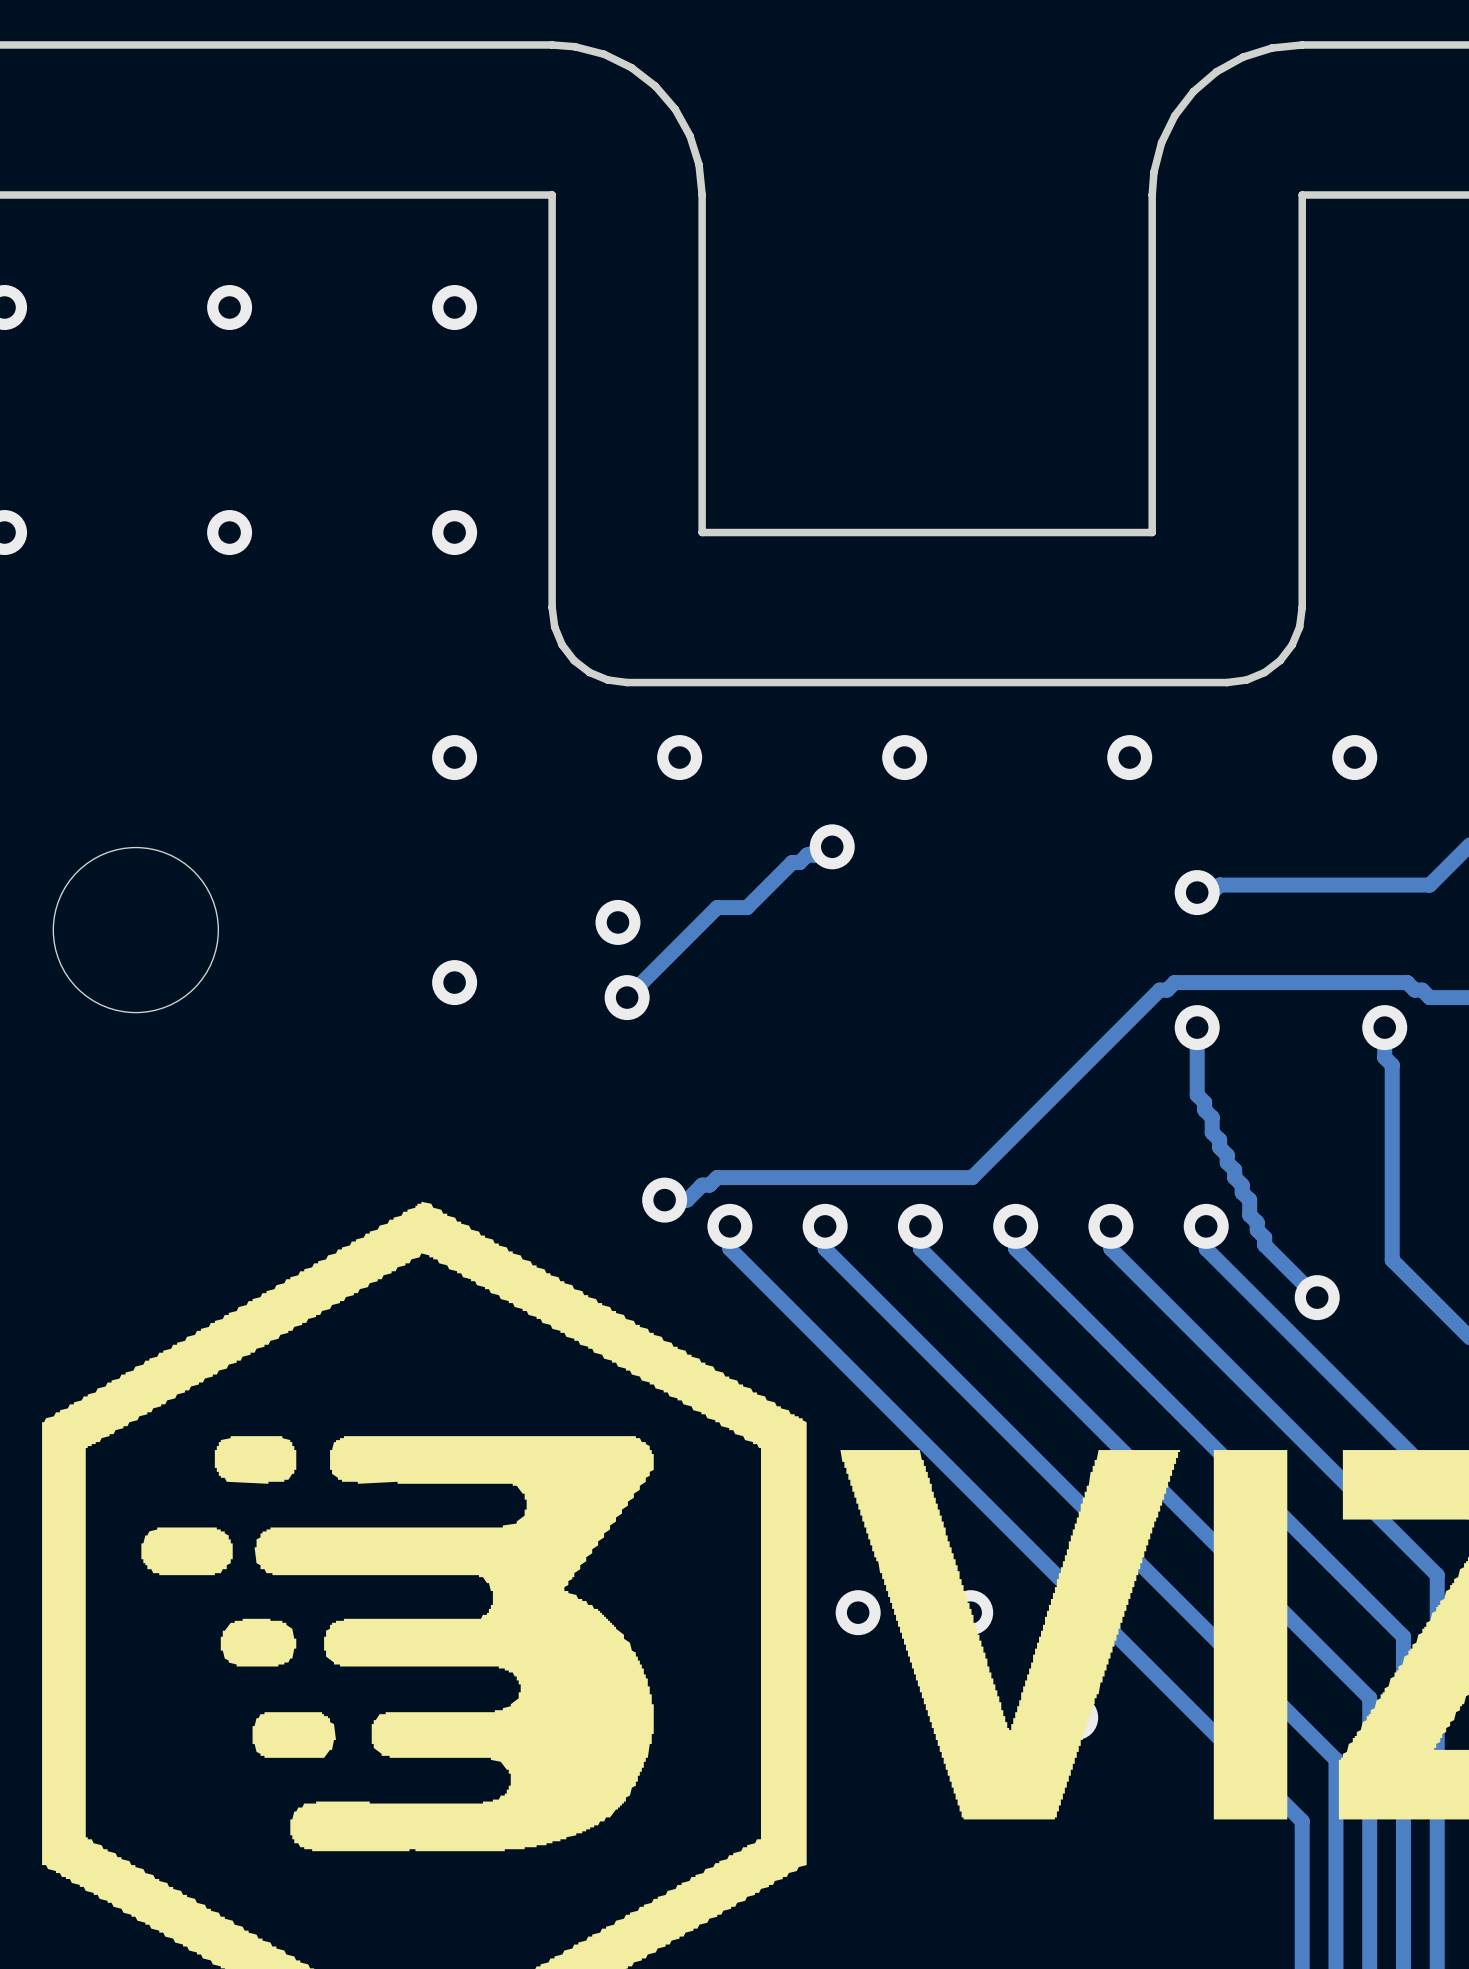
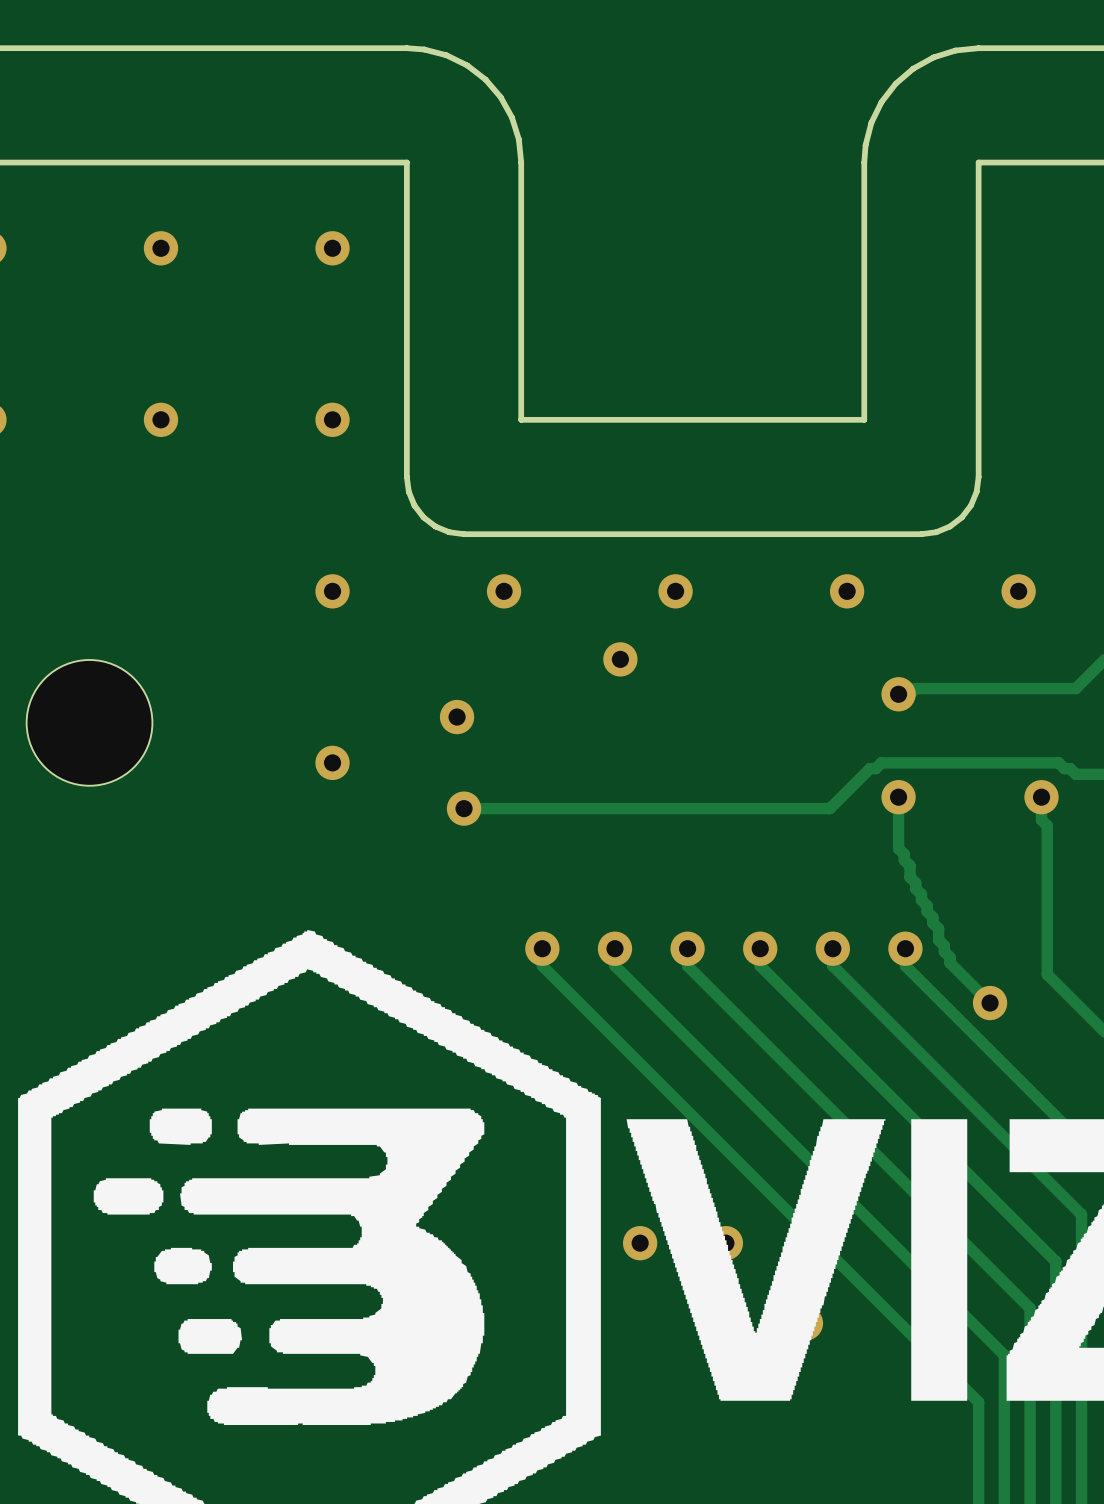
track: (807, 855) (799, 862) (792, 862) (747, 907) (717, 907) (627, 997) -> none
via position: (627, 997) -> (464, 808)
track: (1107, 1042) (972, 1177) (717, 1177) (709, 1185) (702, 1185) (687, 1200) (664, 1200) -> (829, 808) (464, 808)
via: (664, 1200) -> none

